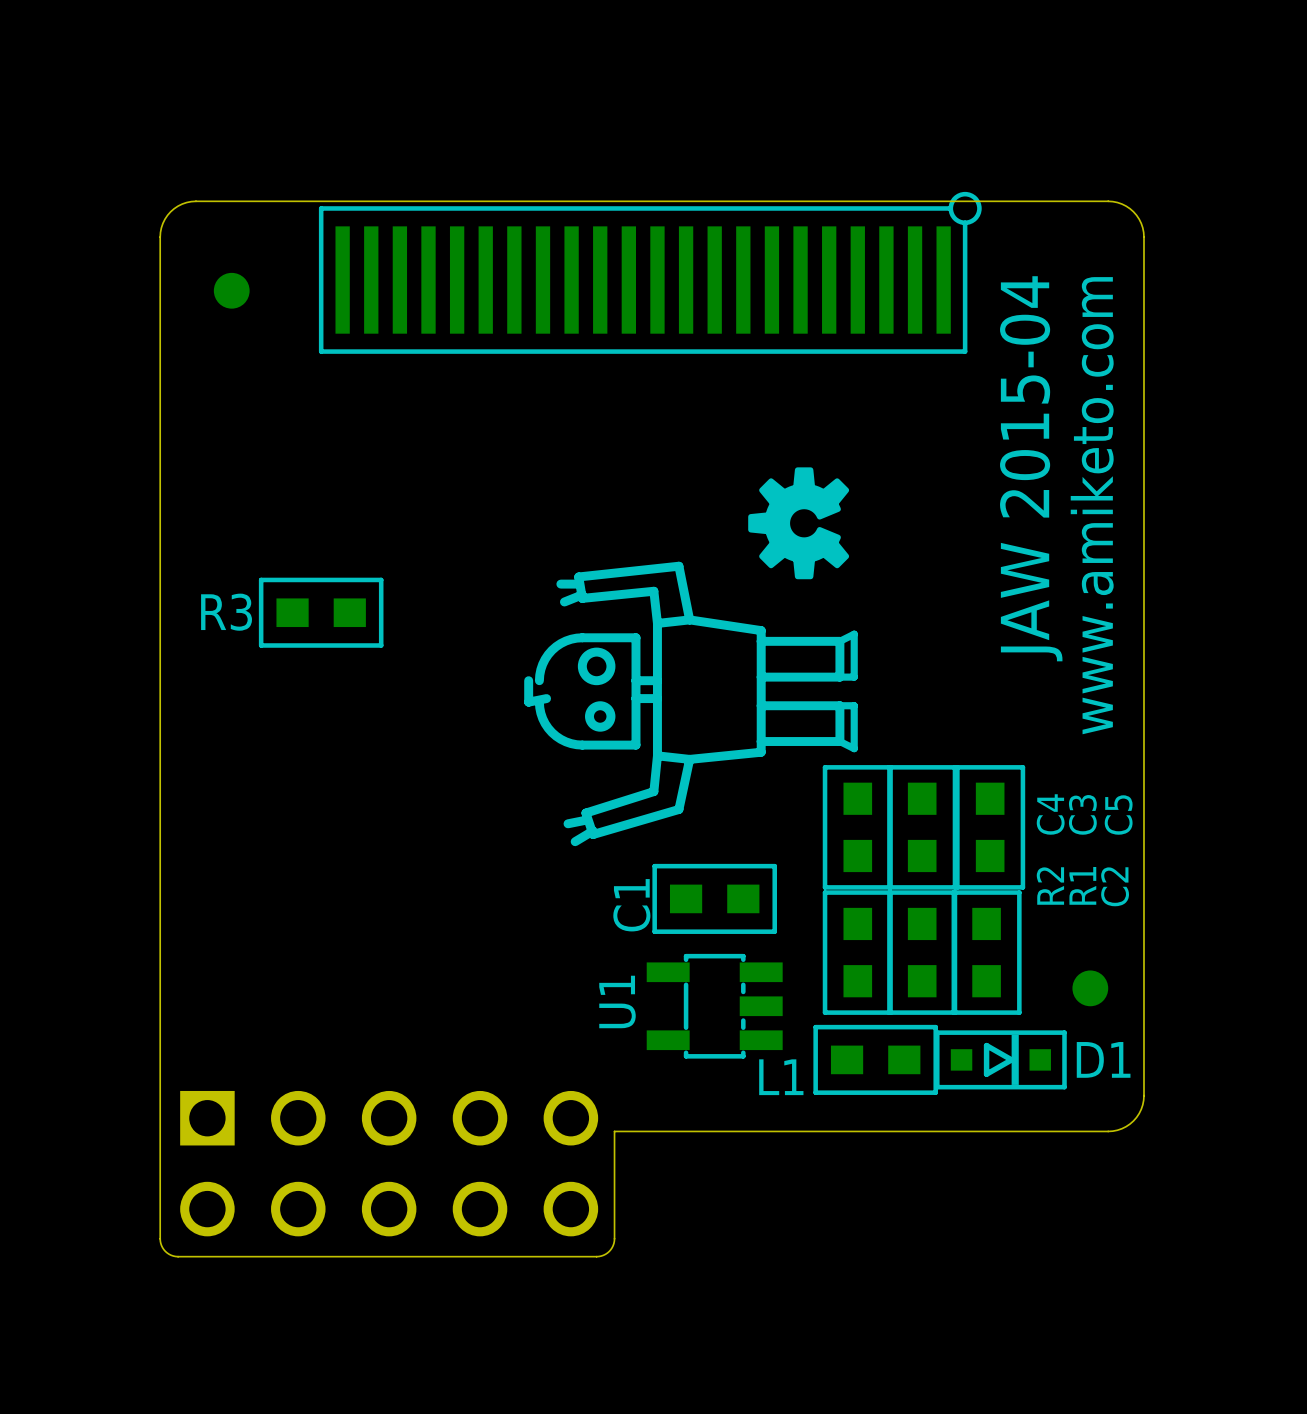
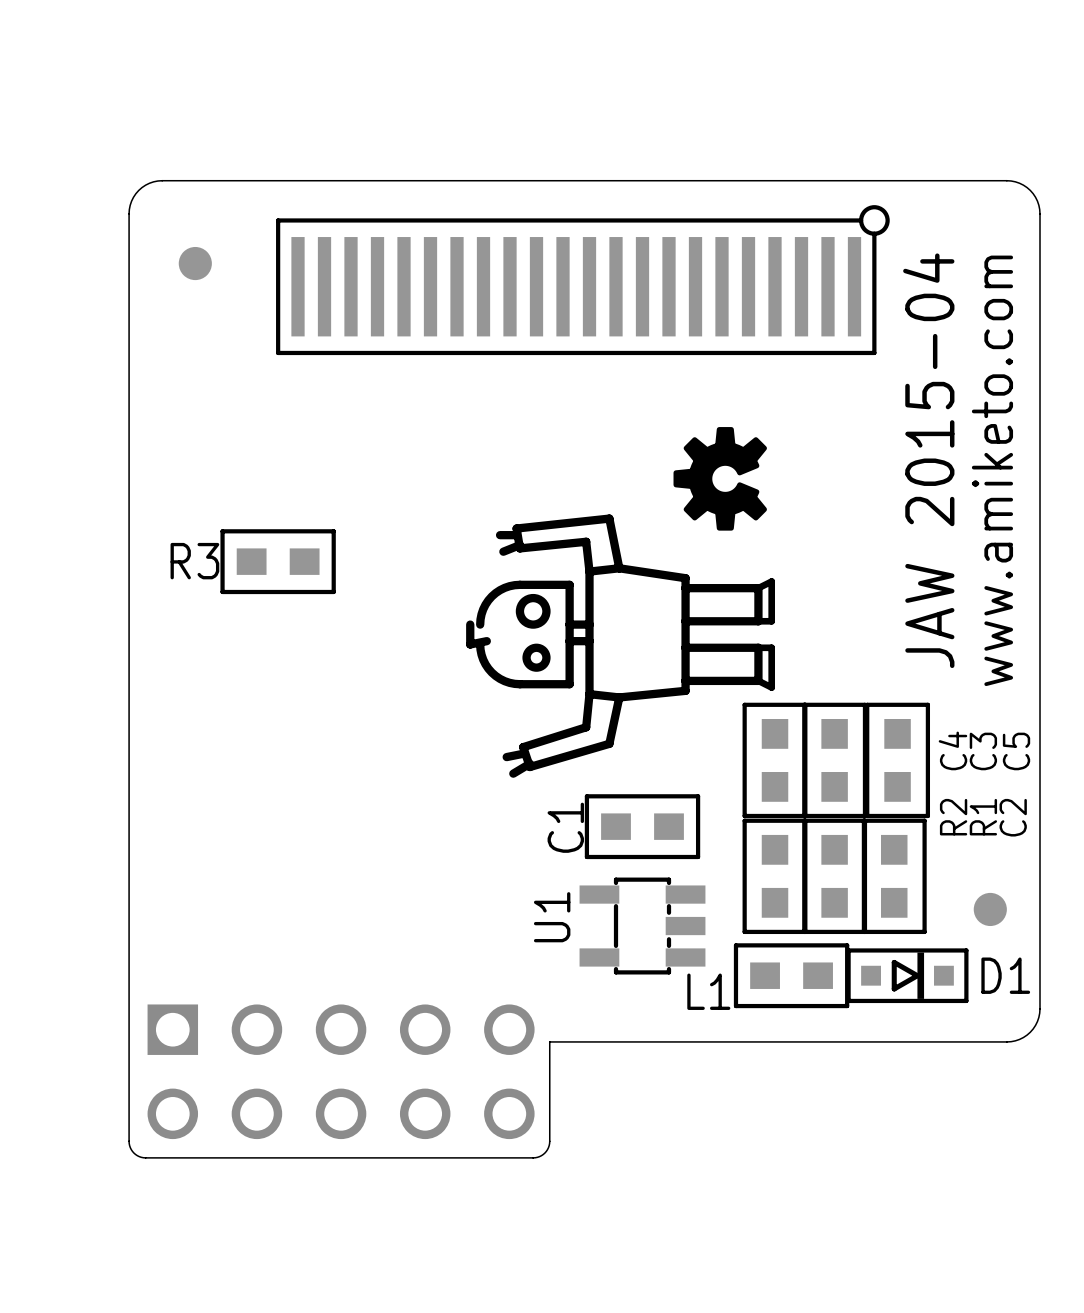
part position: (650, 272) -> (582, 280)

